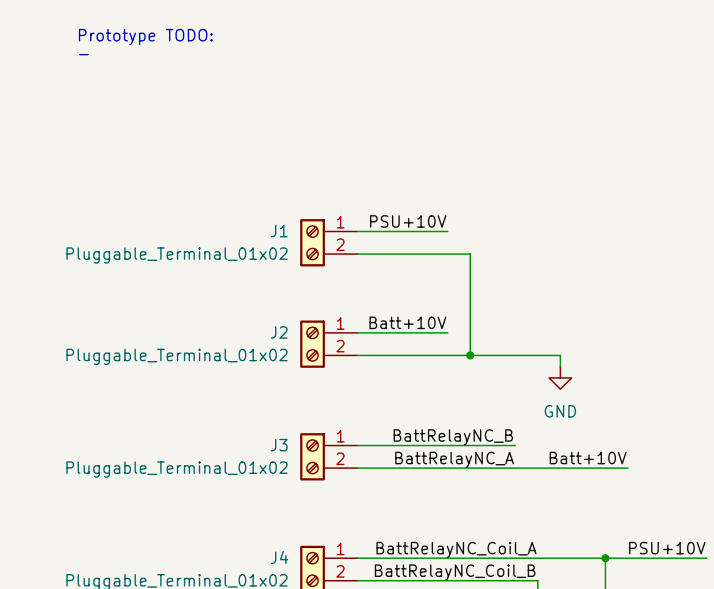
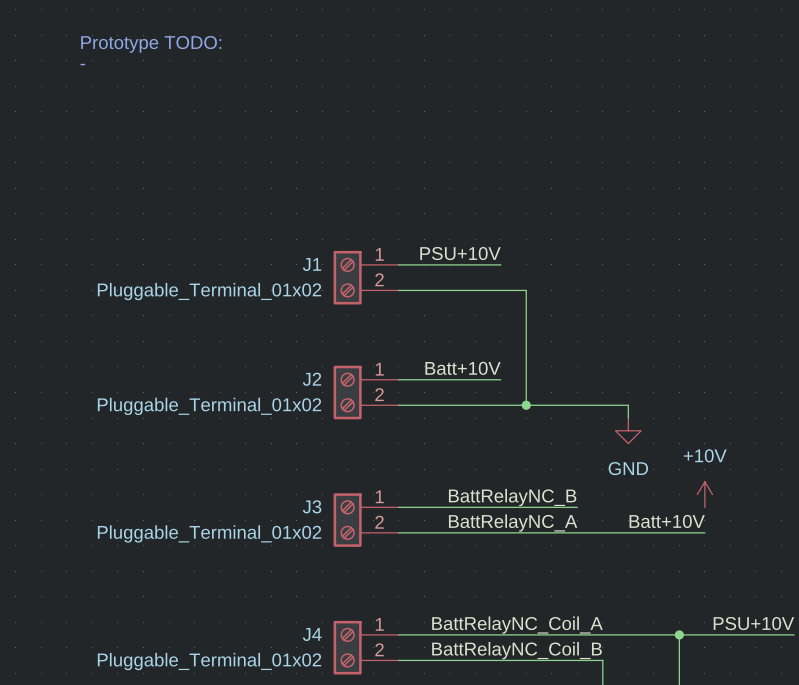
power symbol: none -> +10V (704, 494)

